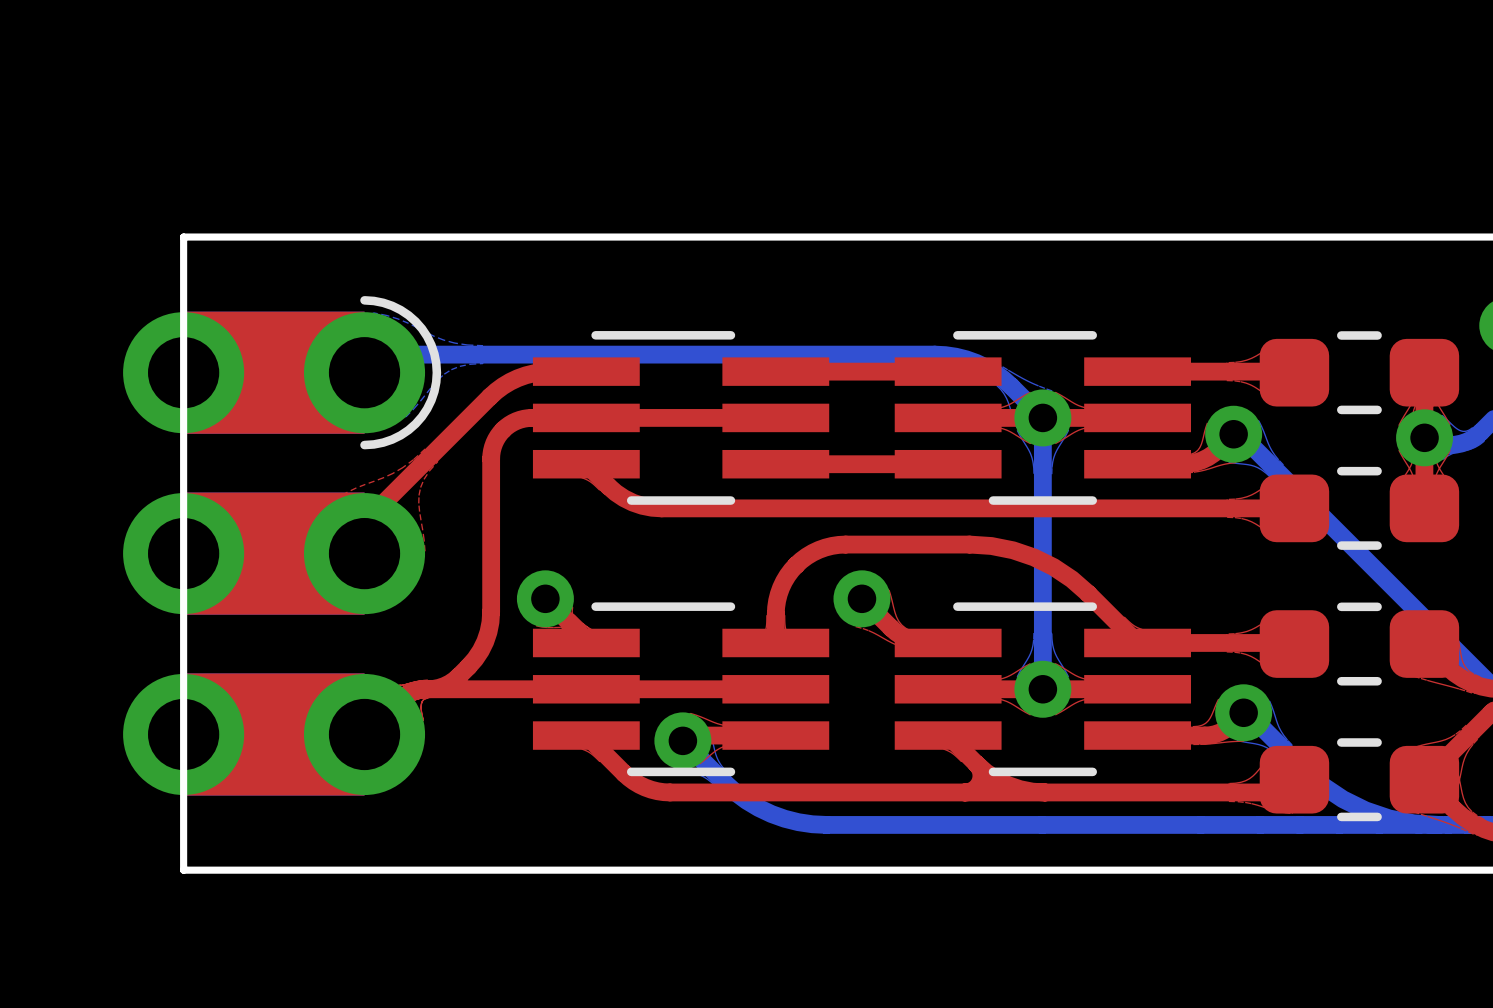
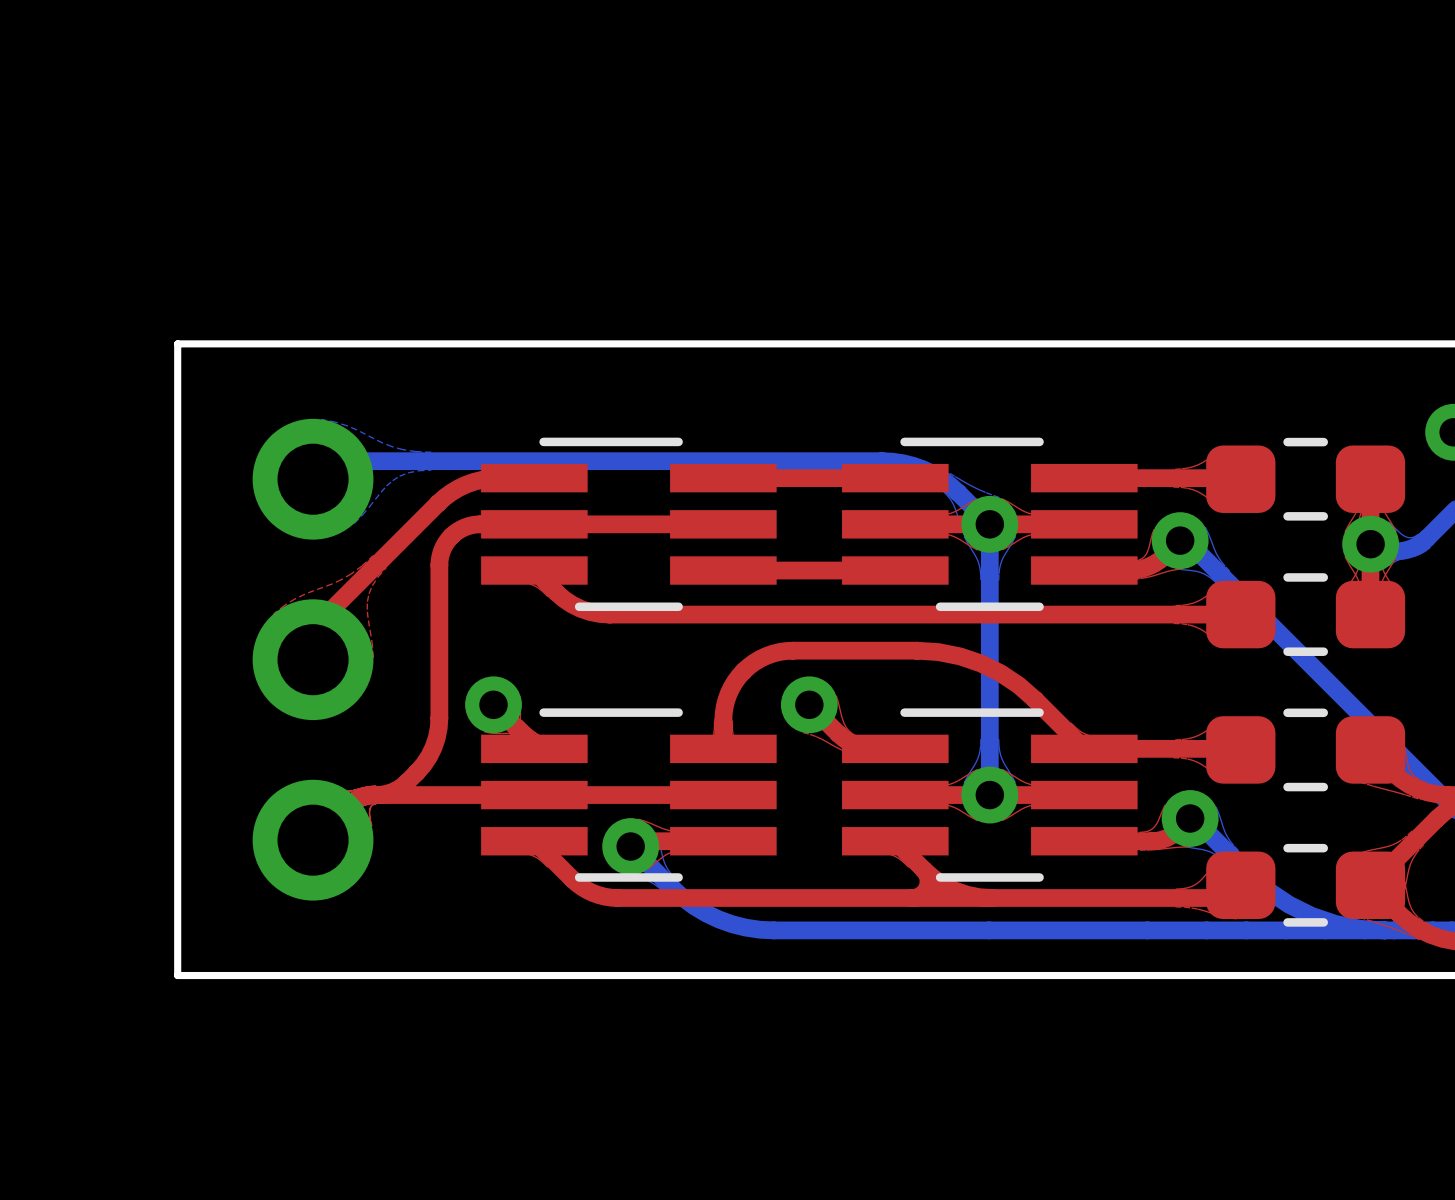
board edge: (228, 237) (183, 237) (183, 870) (228, 870) -> (177, 343) (177, 975)
part: (282, 545) -> none
part: none -> (313, 659)

